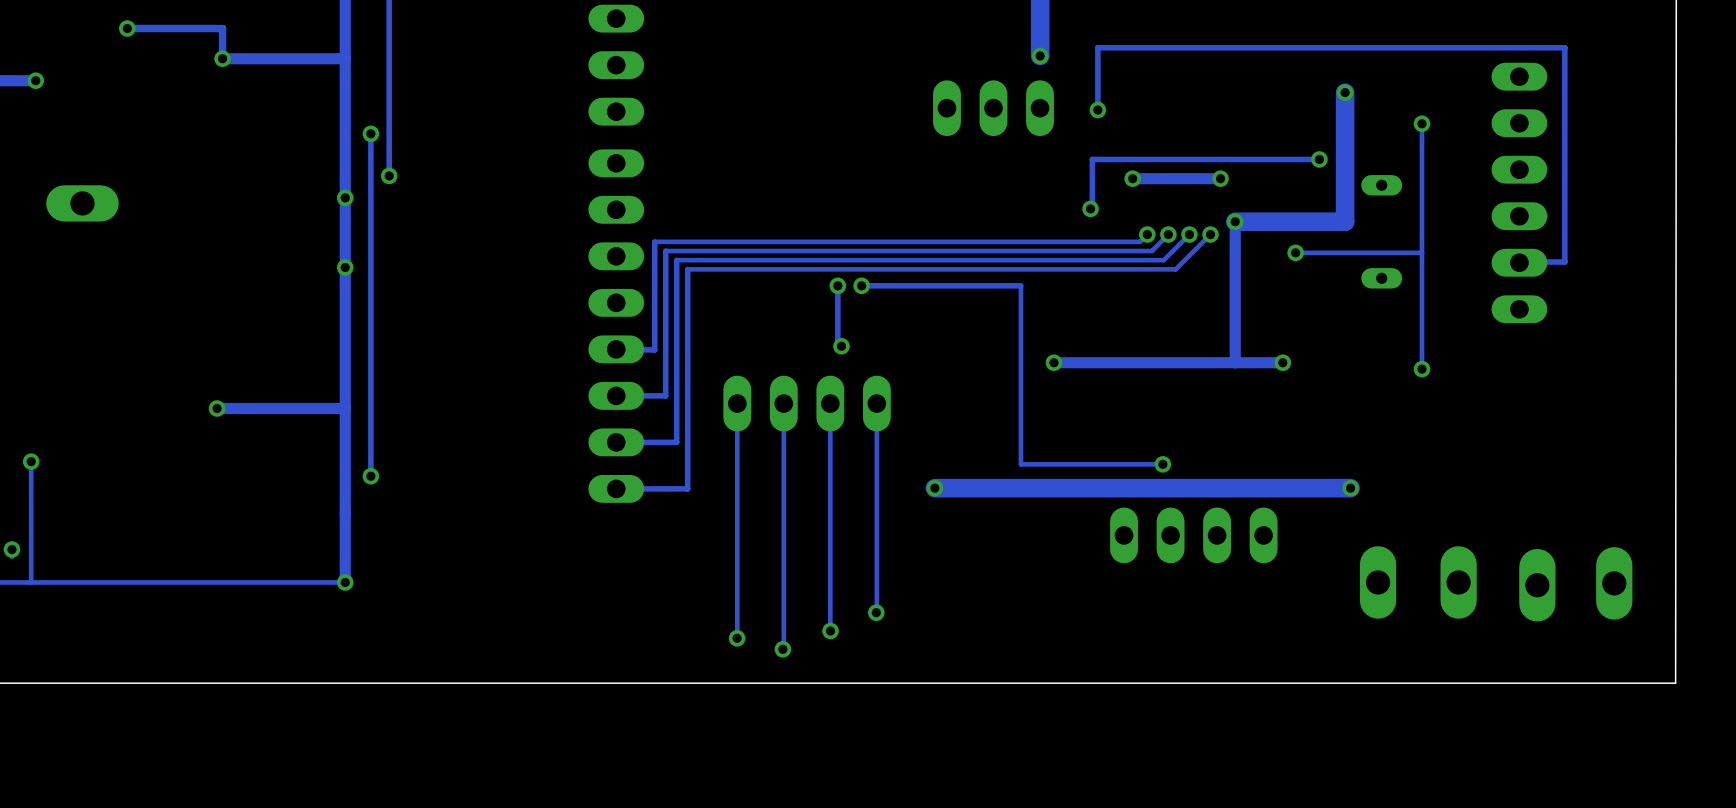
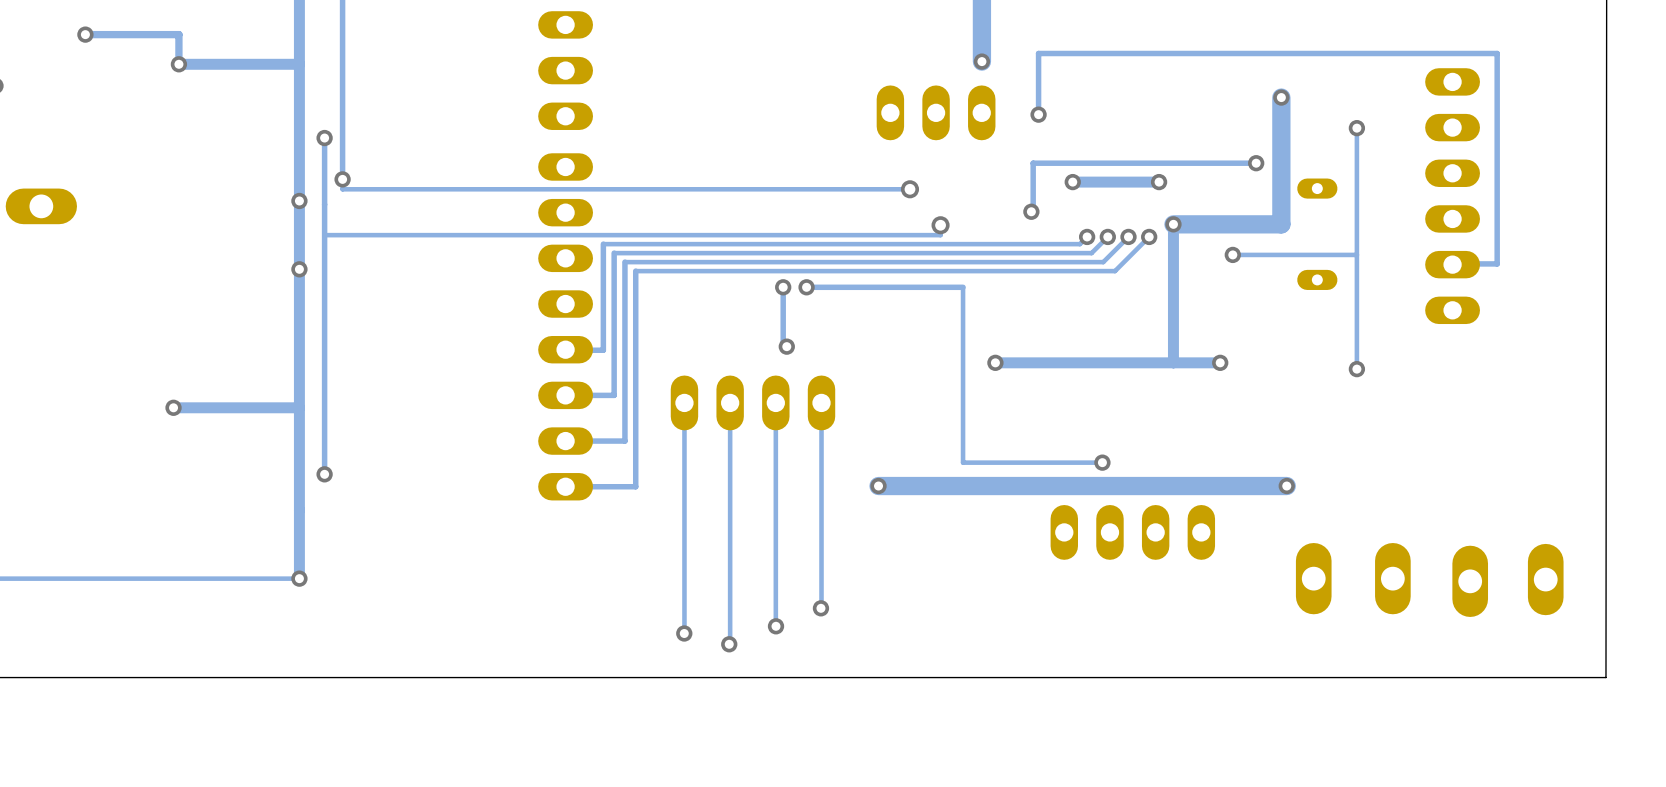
track: none -> (342, 179) (342, 189) (909, 189)
via: none -> (909, 189)
track: none -> (324, 204) (324, 235) (940, 235) (940, 225)
via: none -> (940, 225)

